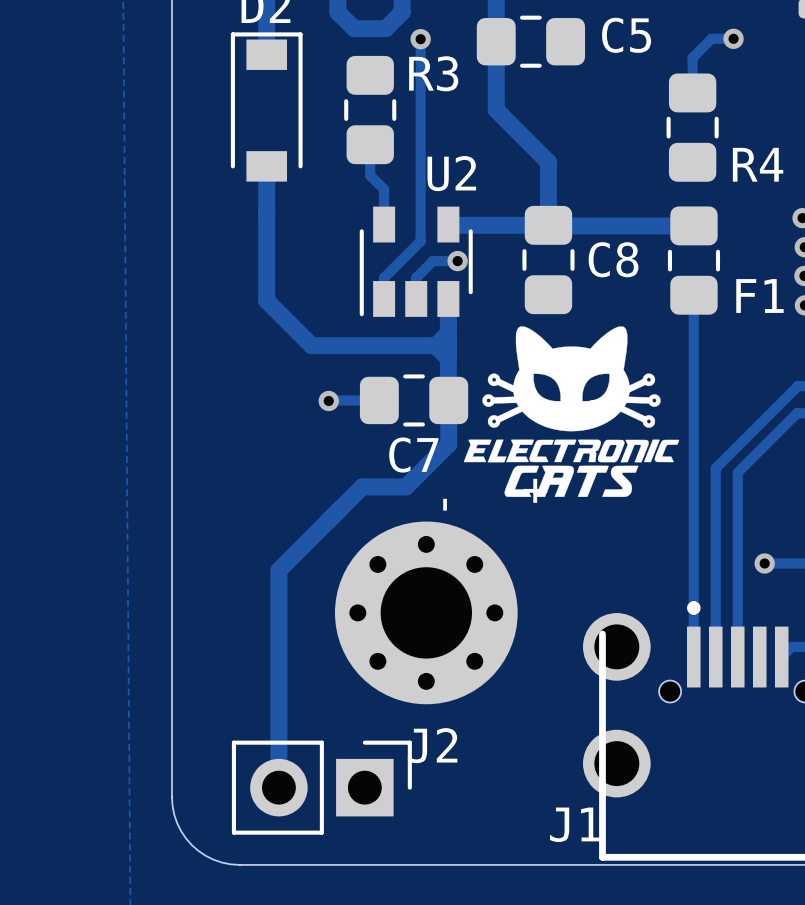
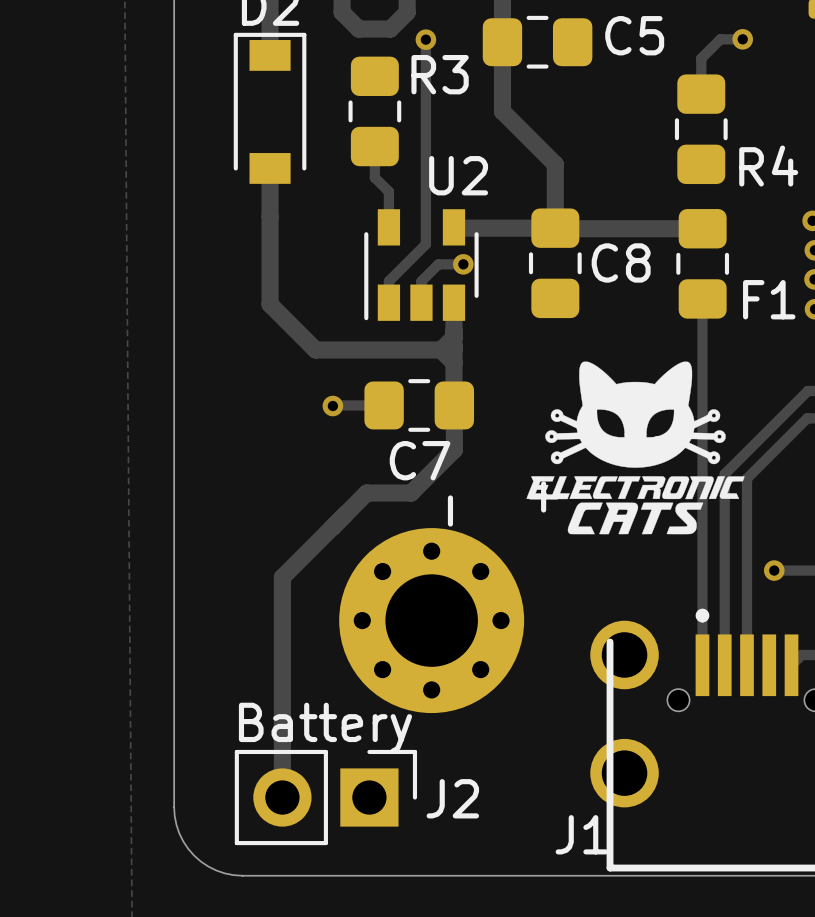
drawing position: (571, 411) -> (635, 447)
text: none -> Battery (325, 728)
J2 name position: J2 (432, 745) -> J2 (452, 798)

